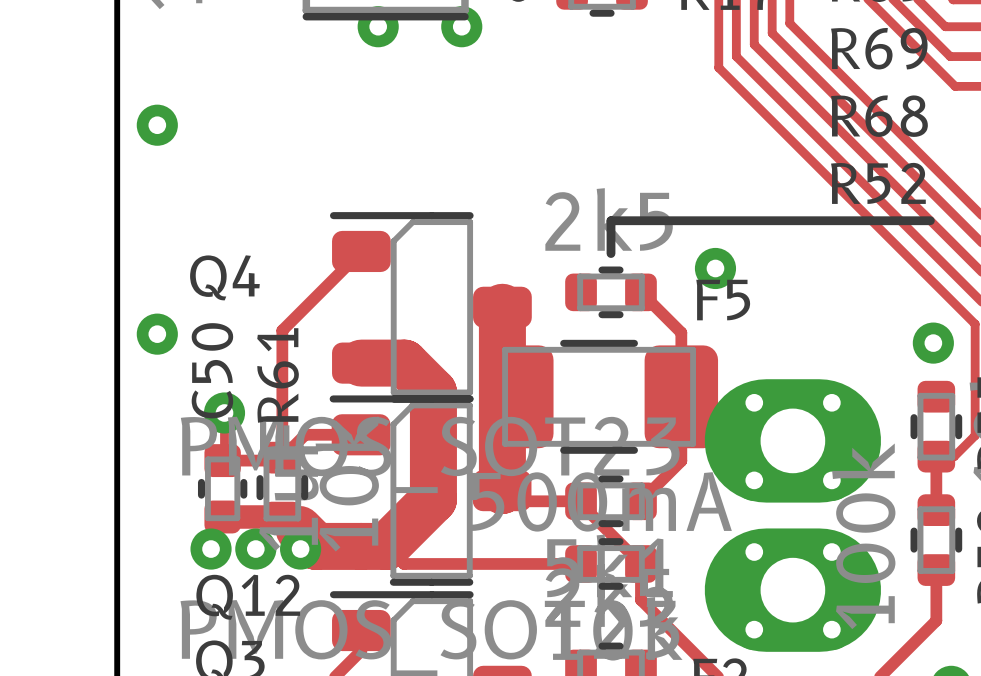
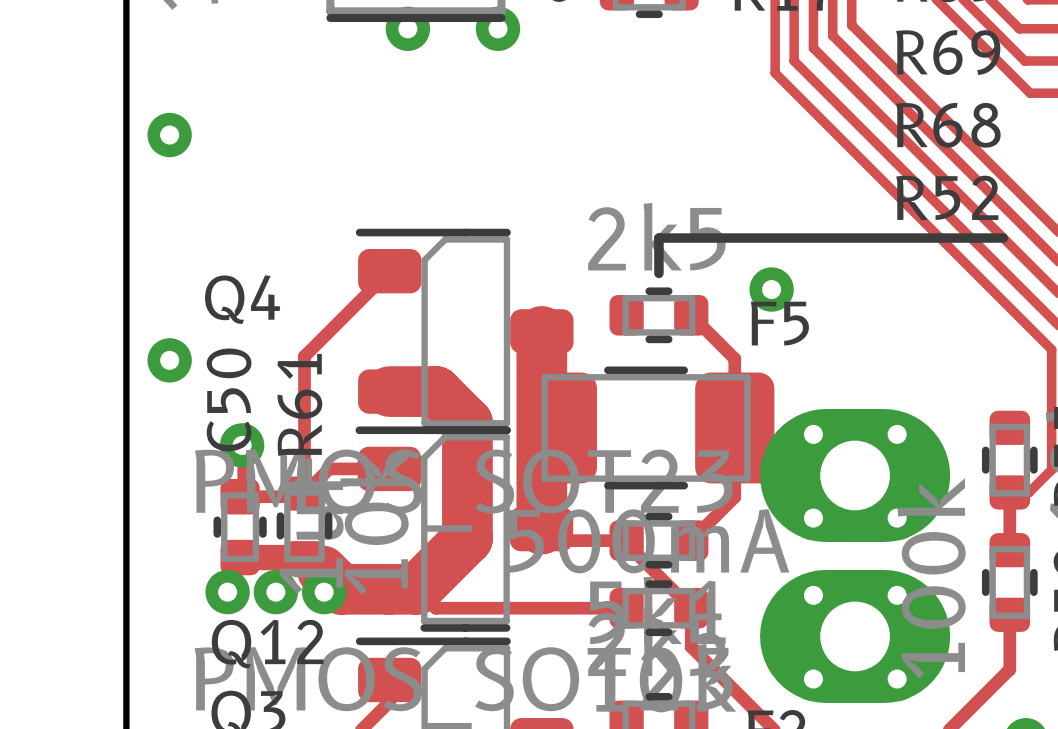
via: (933, 343) -> none

